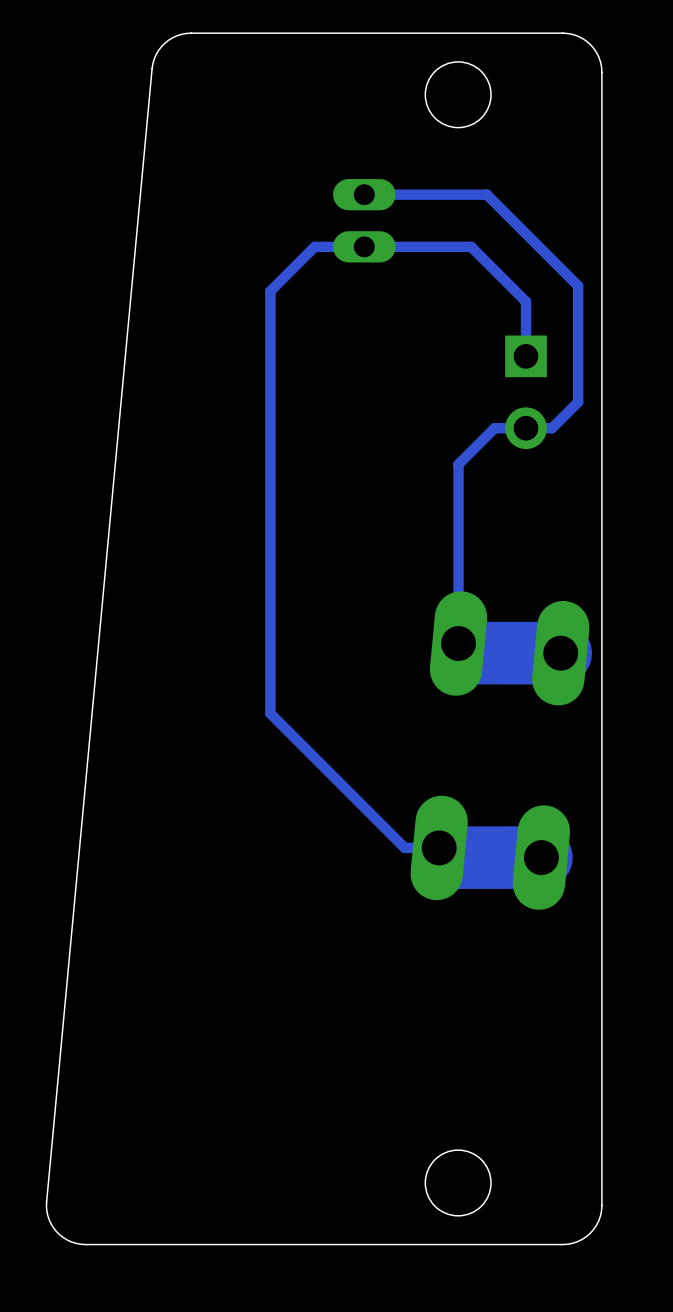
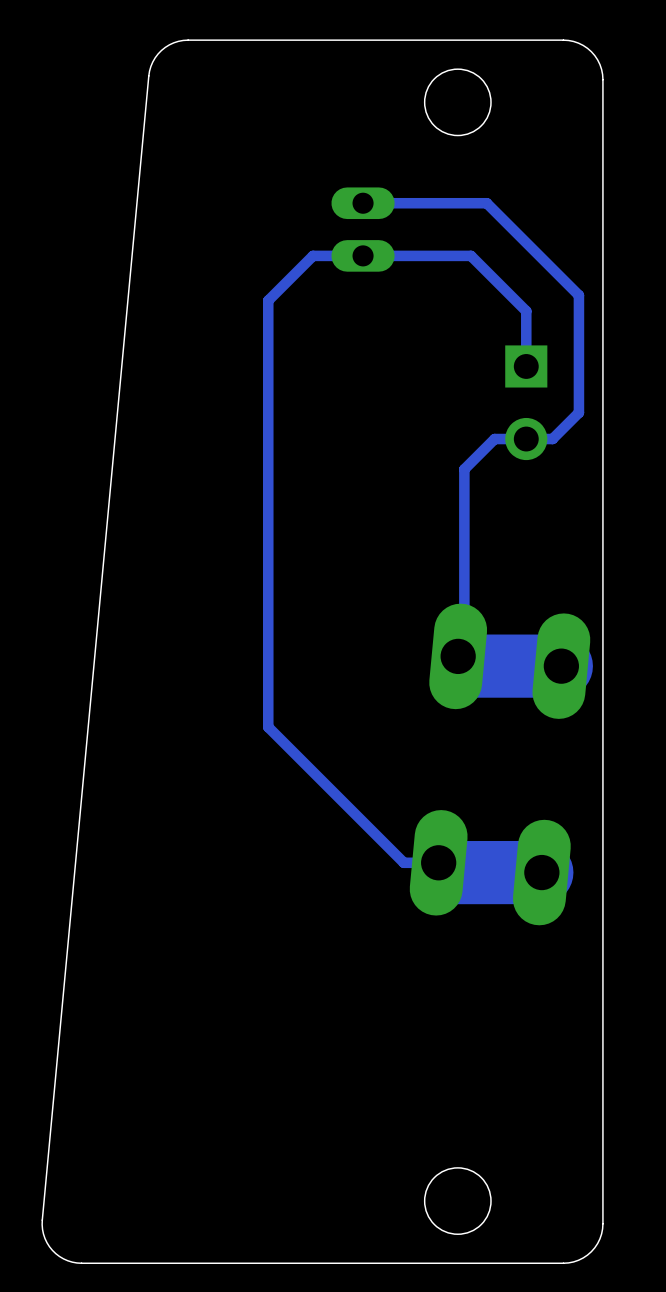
bottom track: (464, 458) (458, 464) (458, 643) -> (464, 469) (464, 656) (472, 666)

